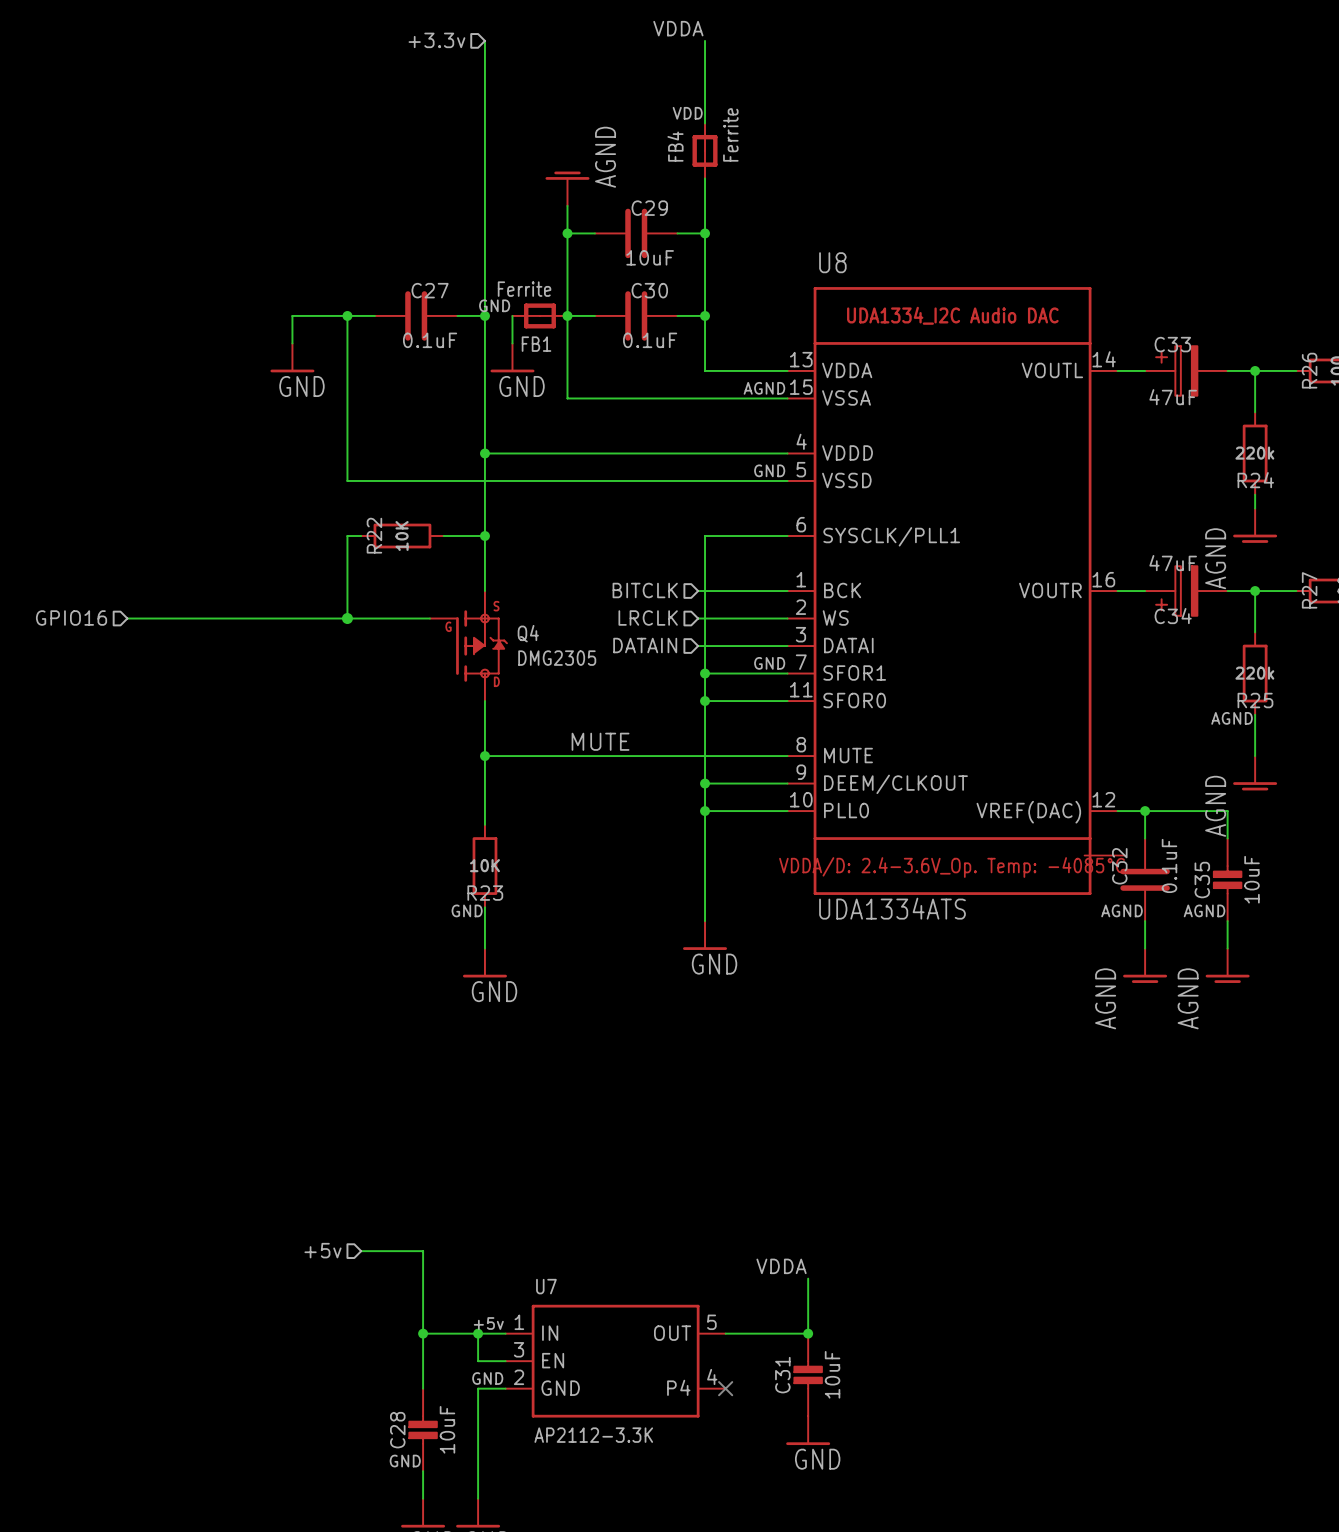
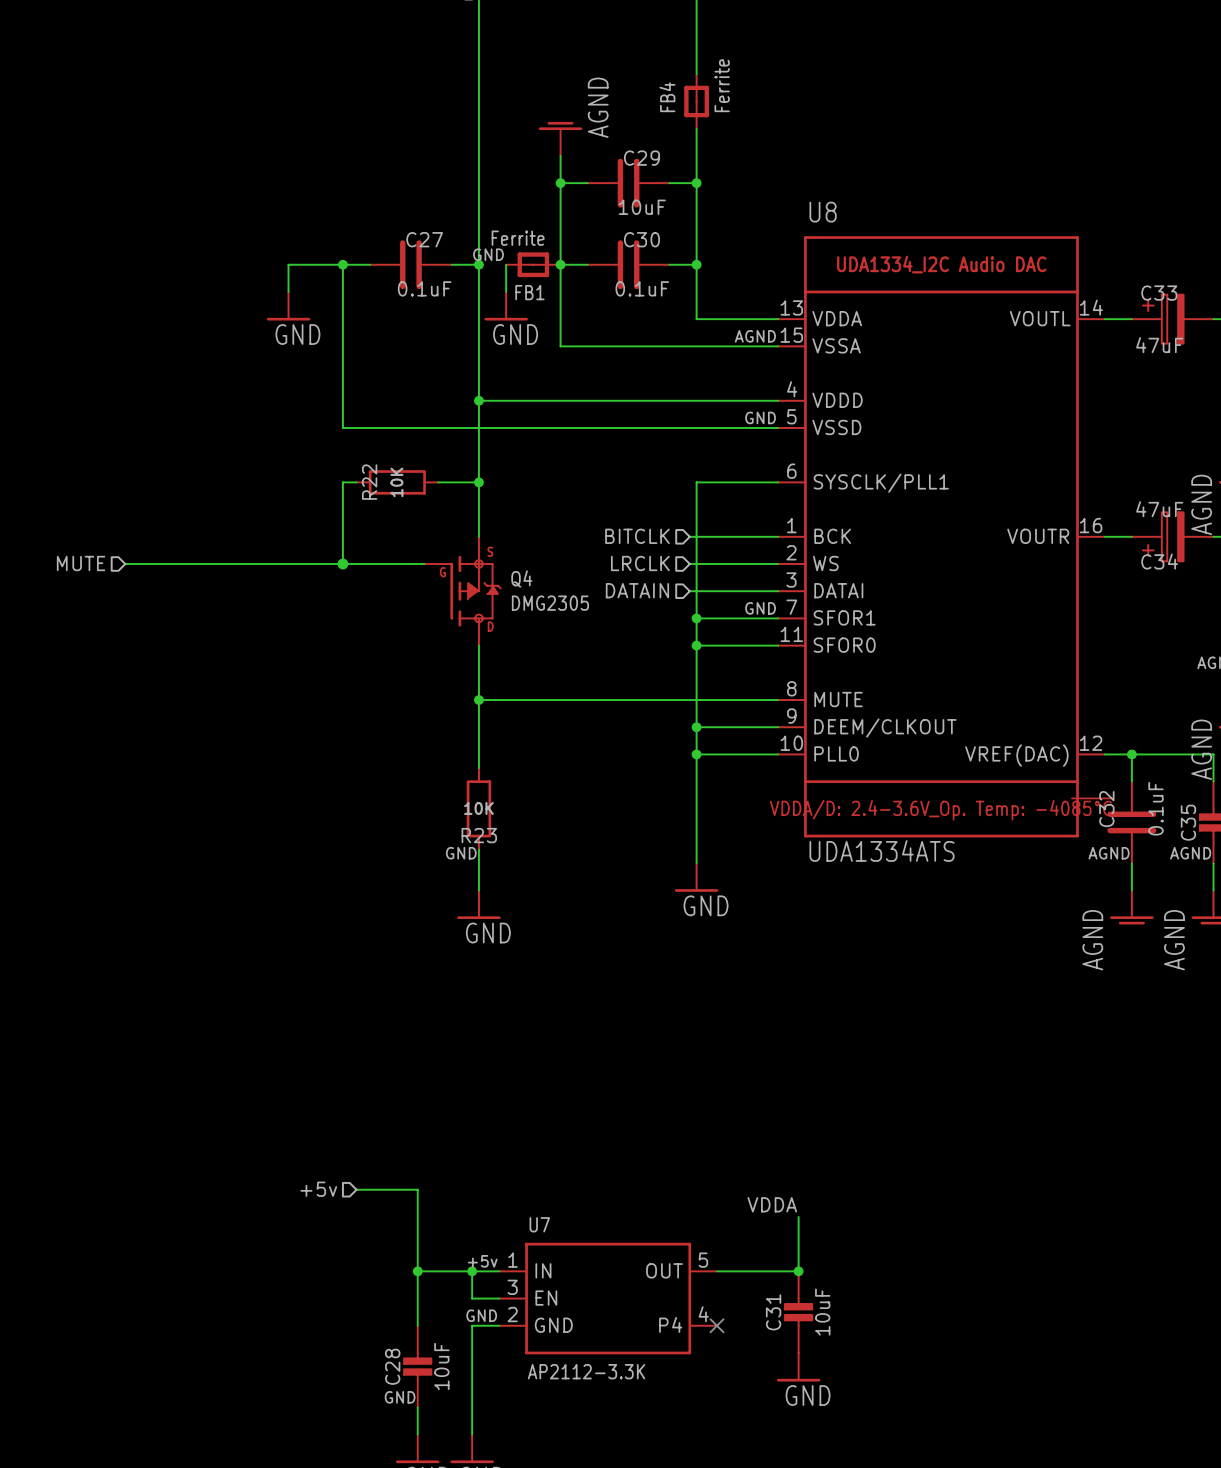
label: VDD (687, 113) -> none
hierarchical label: GPIO16 (71, 618) -> MUTE (81, 563)
label: MUTE (600, 741) -> none

